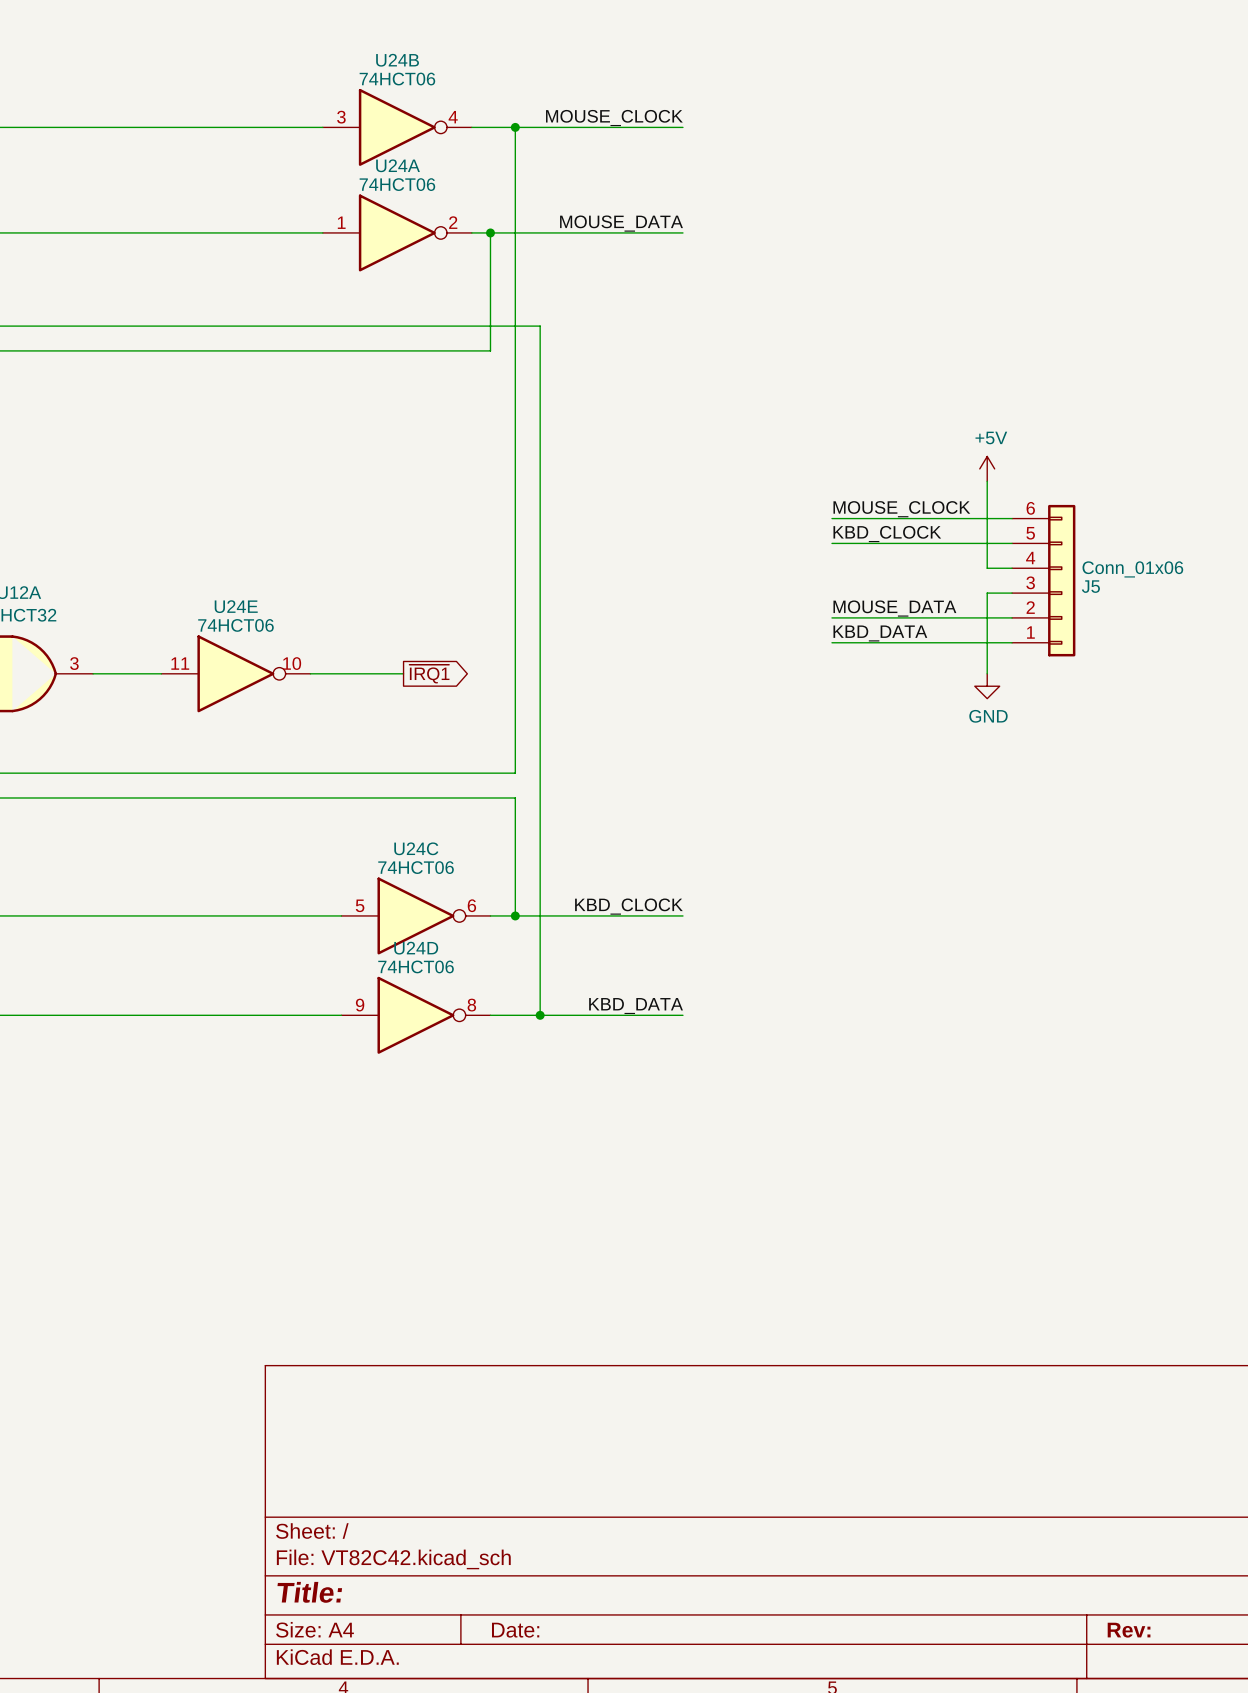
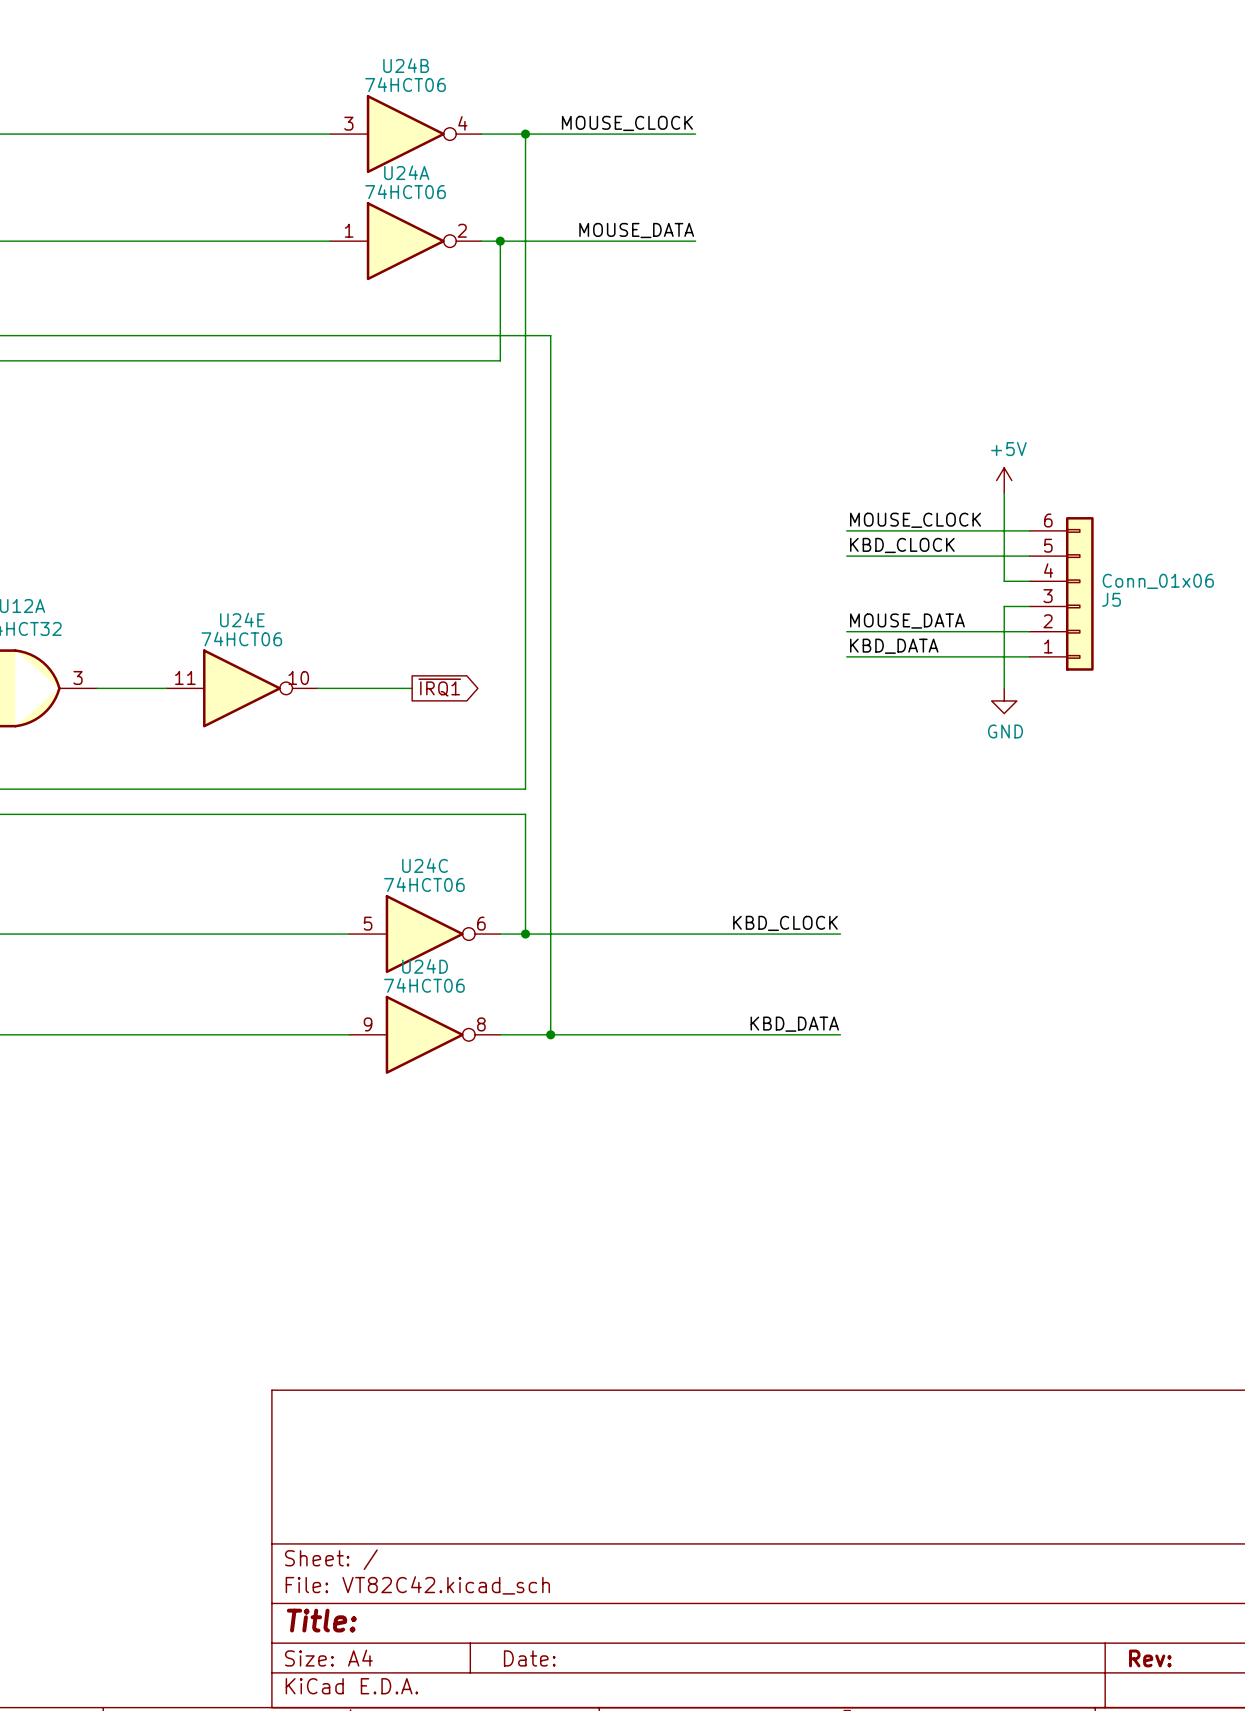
label position: KBD_CLOCK (628, 906) -> KBD_CLOCK (785, 923)
wire: none -> (695, 934) (840, 934)
label position: KBD_DATA (636, 1006) -> KBD_DATA (794, 1024)
wire: none -> (695, 1034) (840, 1034)

